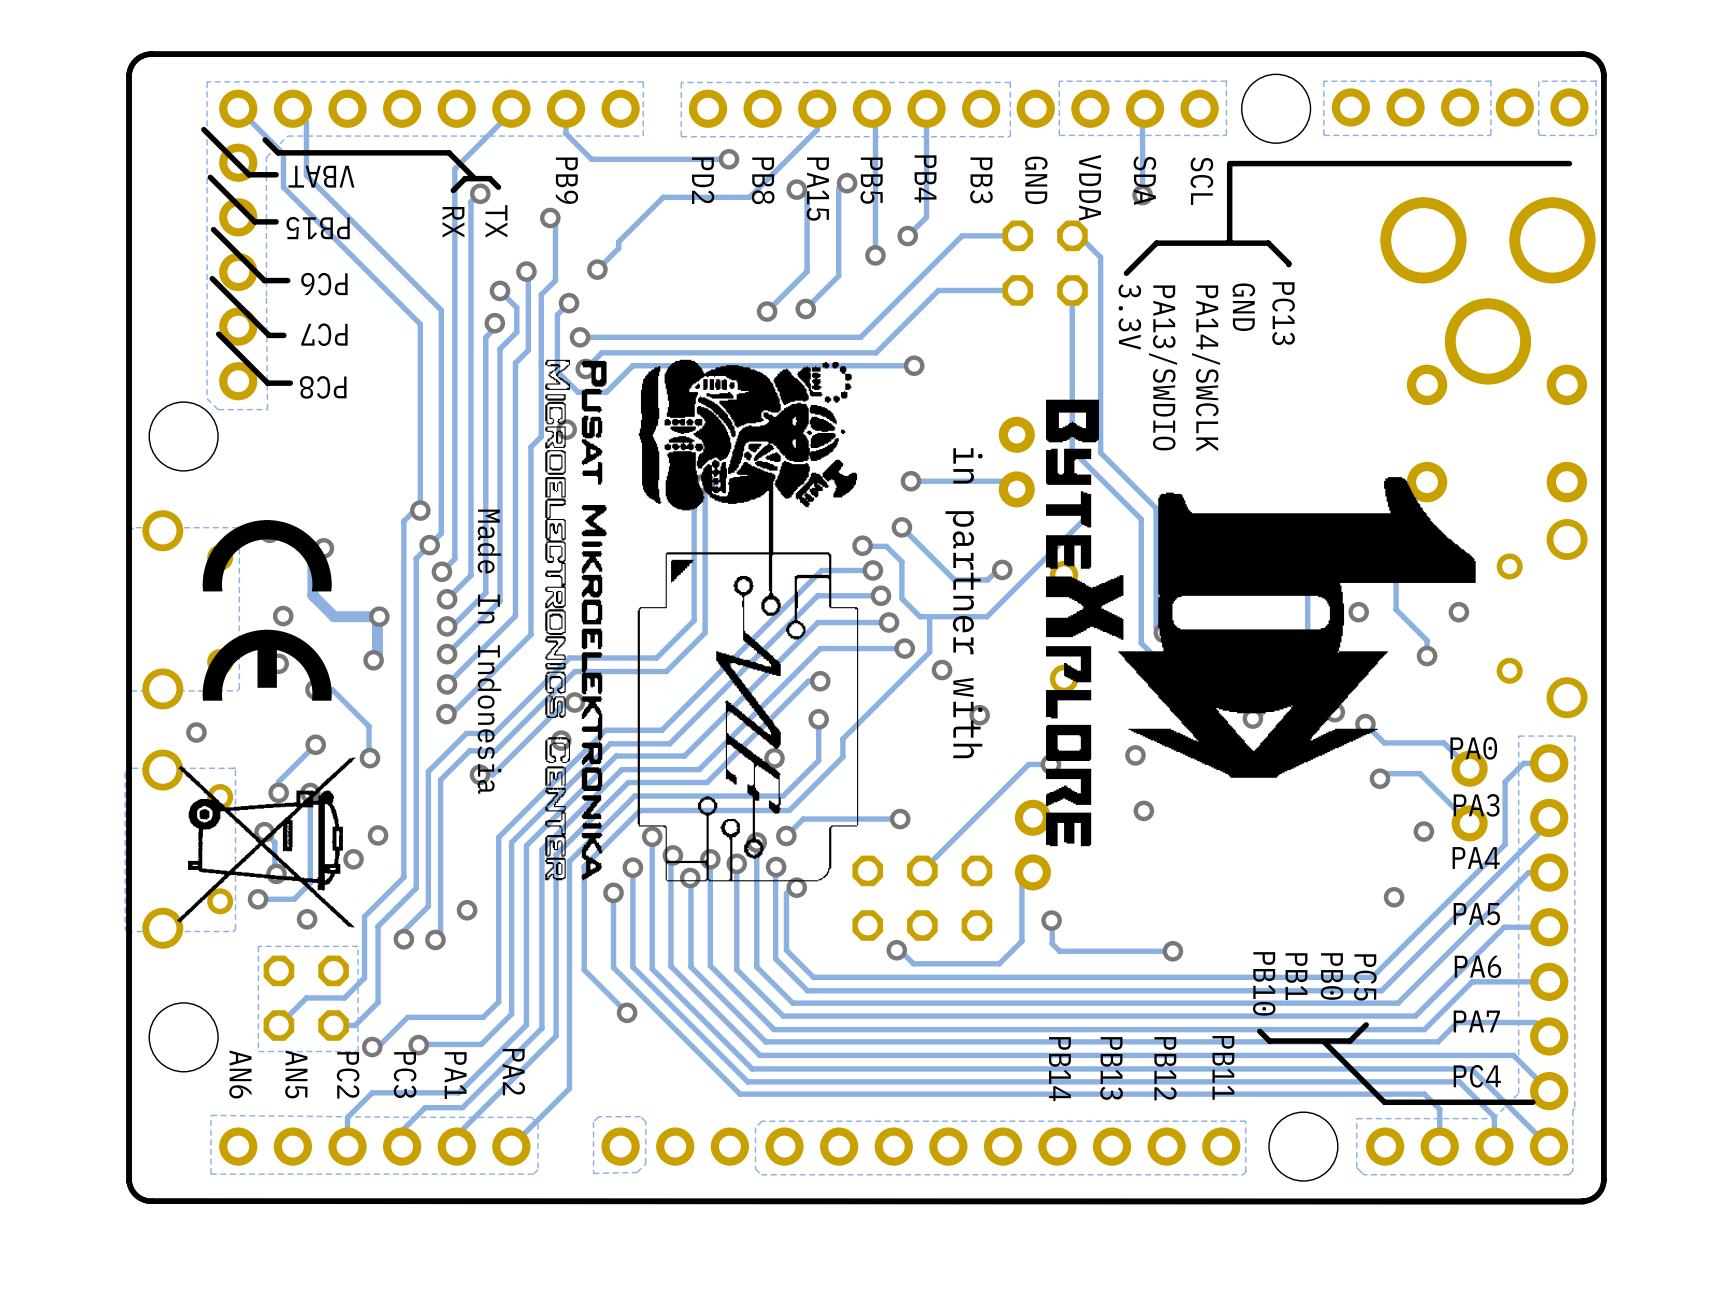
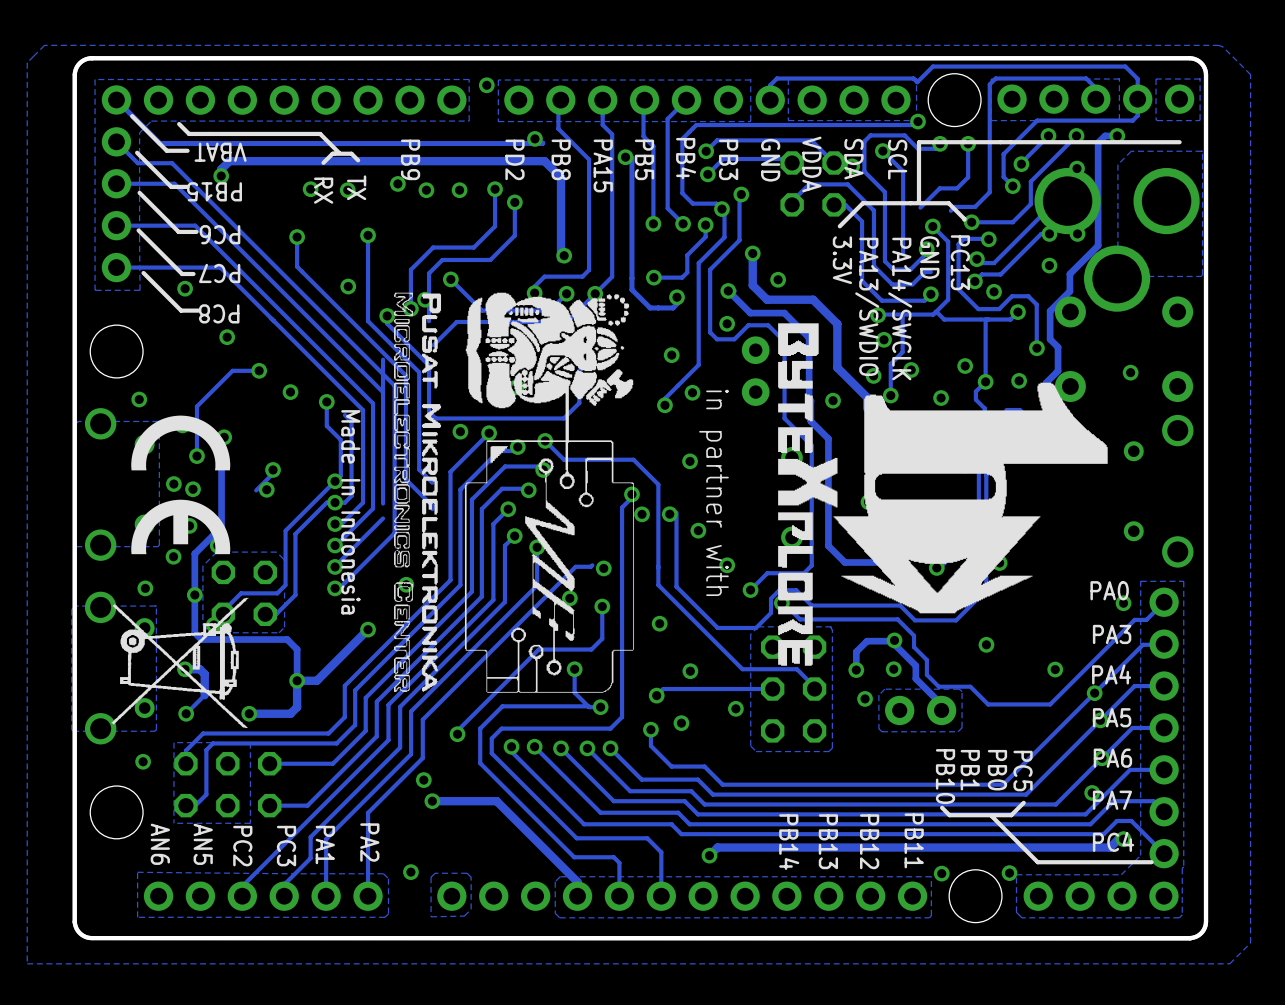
zone outline: none -> (1218, 45) (44, 45) (27, 62) (27, 963) (1229, 963) (1250, 943) (1250, 74) (1222, 46) (1218, 45)
zone outline: (207, 81) (207, 398) (218, 409) (267, 409) (266, 157) (287, 136) -> (134, 79) (95, 79) (95, 290) (140, 290) (139, 132) (151, 121) (196, 121)
via: none -> (486, 85)
track: none -> (1095, 99) (1095, 88) (1086, 78) (995, 78) (989, 84) (989, 192) (975, 206) (954, 206) (950, 210)
track: none -> (116, 99) (160, 143) (542, 143)
track: (238, 108) (283, 153) (283, 187) (420, 324) (420, 510) (414, 510) (403, 521) (403, 670) -> (326, 401) (326, 425) (340, 439) (340, 475) (285, 530)
track: (292, 108) (306, 122) (306, 175) (441, 310) (441, 533) (416, 558) (416, 888) (378, 926) (378, 1002) (355, 1025) (333, 1025) -> none
track: (511, 108) (511, 112) (454, 168) (454, 558) (441, 571) -> none
track: (566, 108) (566, 133) (591, 159) (729, 159) -> none
track: (871, 108) (875, 112) (875, 255) -> (644, 100) (643, 136) (653, 146) (653, 223)
track: (926, 108) (926, 217) (907, 236) -> (686, 100) (667, 118) (667, 208) (683, 223)
track: none -> (770, 100) (770, 85) (776, 78) (913, 78) (917, 82) (932, 66) (1125, 66) (1137, 78) (1137, 115) (1132, 120) (1037, 120) (1003, 154) (1003, 176) (1012, 186)
track: (1145, 108) (1142, 111) (1142, 195) -> none
track: none -> (558, 102) (558, 128) (589, 159) (589, 270) (582, 276) (544, 276) (534, 286) (534, 293)
track: (817, 129) (749, 197) (663, 197) (618, 241) (618, 248) (597, 269) -> (602, 116) (602, 124) (612, 134) (612, 276) (566, 321) (456, 321) (433, 345)
track: none -> (918, 121) (914, 125) (696, 125) (682, 138) (682, 193) (692, 203) (716, 203) (724, 211) (724, 237) (698, 263) (698, 364) (664, 398) (664, 405)
via: none -> (918, 121)
track: none -> (1048, 135) (1021, 164)
via: none -> (1048, 135)
track: none -> (1076, 135) (1030, 181) (1030, 204) (1012, 222) (971, 222)
via: none -> (1076, 135)
track: none -> (1117, 135) (1105, 135) (1098, 142) (1098, 245) (1069, 273) (1069, 291) (1050, 311) (1050, 339) (1058, 347) (1058, 370) (1046, 382) (1046, 441) (1062, 458)
via: none -> (1117, 135)
track: none -> (116, 141) (137, 163) (172, 163) (394, 385) (394, 533) (339, 588) (335, 588)
track: none -> (940, 143) (935, 148) (918, 148) (904, 135) (870, 135) (864, 141) (864, 171) (884, 192) (884, 261) (893, 269) (910, 269) (926, 253) (926, 249)
via: none -> (940, 143)
track: none -> (968, 143) (968, 177) (957, 188) (939, 188) (920, 207)
via: none -> (968, 143)
zone outline: none -> (1201, 150) (1202, 274) (1119, 276) (1117, 164) (1131, 151) (1201, 150)
track: none -> (706, 151) (717, 140) (811, 140) (834, 162)
via: none -> (706, 151)
track: none -> (882, 151) (903, 171) (903, 253)
via: none -> (882, 151)
track: (847, 183) (845, 181) (838, 188) (838, 276) (805, 308) -> none
track: none -> (631, 157) (631, 289) (650, 307) (673, 307) (679, 301)
track: (796, 189) (800, 189) (807, 196) (807, 271) (767, 311) -> none
via: (796, 189) -> none
track: none -> (792, 162) (788, 159) (723, 159) (707, 174)
via: none -> (1021, 164)
track: (480, 193) (470, 201) (470, 575) (447, 599) -> none
via: (480, 193) -> none
via: none -> (1077, 168)
via: none -> (707, 174)
track: none -> (221, 176) (221, 169) (229, 161) (544, 161) (561, 177) (561, 258)
via: none -> (221, 176)
track: none -> (116, 183) (174, 183) (383, 392)
track: (550, 218) (555, 218) (555, 280) (541, 294) (541, 436) (530, 447) -> none
via: none -> (1012, 186)
via: none -> (310, 189)
track: none -> (495, 189) (495, 226) (473, 247) (433, 247) (410, 269) (410, 308)
via: none -> (495, 189)
via: none -> (347, 190)
via: none -> (426, 190)
via: none -> (459, 190)
track: none -> (741, 194) (739, 196) (739, 240) (710, 269) (710, 332) (717, 339) (734, 339) (748, 325) (768, 325) (784, 341) (784, 418) (811, 445) (811, 565) (804, 573) (767, 573) (750, 590)
via: none -> (741, 194)
track: (1017, 235) (962, 235) (860, 337) (579, 337) -> none
track: (1072, 235) (1079, 235) (1100, 257) (1100, 452) (1156, 508) (1156, 627) (1161, 633) (1163, 632) -> none
via: (907, 236) -> none
track: none -> (1049, 201) (1049, 207) (994, 263) (977, 263) (976, 259)
track: none -> (514, 202) (514, 235) (490, 259) (442, 259) (429, 273) (429, 321)
via: none -> (514, 202)
track: none -> (792, 204) (792, 201) (809, 184) (847, 184) (873, 210) (873, 266) (892, 284) (912, 284) (924, 272) (930, 272)
track: none -> (834, 204) (845, 204) (862, 221) (862, 280) (881, 300) (924, 300) (930, 294)
via: none -> (721, 209)
via position: (875, 255) -> (653, 223)
part position: (1045, 263) -> (813, 183)
via: none -> (971, 222)
via: (597, 269) -> none
via: none -> (683, 223)
part position: (238, 271) -> (116, 183)
track: (526, 271) (528, 273) (528, 350) (515, 363) (515, 616) (447, 684) -> none
via: (526, 271) -> none
track: none -> (705, 225) (705, 236) (687, 255) (687, 272) (682, 277) (653, 277)
via: none -> (705, 225)
track: none -> (116, 225) (195, 225) (373, 403) (373, 508) (335, 545)
track: none -> (932, 226) (948, 241) (948, 299) (933, 314) (881, 314) (878, 317) (878, 315)
via: none -> (932, 226)
track: none -> (1049, 233) (1041, 233) (1000, 274) (981, 274) (974, 281)
via: none -> (1049, 233)
via: none -> (1077, 233)
track: none -> (368, 235) (368, 321) (419, 372) (419, 469) (432, 482)
via: none -> (368, 235)
track: none -> (297, 237) (297, 266) (405, 375) (405, 479) (432, 505) (432, 509)
via: none -> (297, 237)
track: (499, 290) (516, 307) (516, 332) (499, 348) (499, 601) (447, 654) -> none
via: (499, 290) -> none
track: (1017, 290) (938, 290) (876, 352) (601, 352) (585, 368) -> none
track: (1072, 290) (1072, 450) (1141, 519) (1141, 643) (1196, 697) -> none
track: none -> (988, 239) (964, 238) (958, 244) (958, 289) (978, 309) (999, 309) (1012, 296) (1028, 296) (1036, 304) (1036, 348)
via: none -> (988, 239)
track: (569, 303) (557, 314) (557, 371) (578, 392) (606, 392) (632, 365) (914, 365) -> none
via: (569, 303) -> none
via: none -> (926, 249)
via: (805, 308) -> none
track: none -> (752, 253) (752, 285) (767, 299) (813, 299) (837, 323) (837, 367) (867, 397) (867, 408)
via: none -> (752, 253)
via: none -> (976, 259)
track: (494, 323) (494, 328) (485, 337) (485, 592) (452, 626) (447, 626) -> none
via: (494, 323) -> none
via: none -> (1049, 265)
track: none -> (116, 267) (220, 267) (363, 410) (363, 502) (341, 524) (335, 524)
via: (579, 337) -> none
via: none -> (653, 277)
track: none -> (450, 279) (482, 310) (549, 310) (566, 293)
via: none -> (450, 279)
via: none -> (778, 279)
via: none -> (974, 281)
via: none -> (348, 286)
via: none -> (185, 288)
via: none -> (728, 290)
track: none -> (734, 290) (728, 290) (750, 313) (784, 313) (809, 337) (810, 421) (828, 438) (828, 545) (844, 562) (879, 562) (883, 565)
via: none -> (994, 291)
via: none -> (534, 293)
via: none -> (566, 293)
via: none -> (595, 293)
via: none -> (930, 294)
via: none -> (410, 308)
track: none -> (935, 312) (944, 319) (988, 319)
track: none -> (1017, 312) (1010, 319) (985, 319) (985, 381) (975, 391) (975, 399) (984, 408) (984, 433) (989, 438) (1006, 438)
via: none -> (1017, 312)
track: none -> (902, 314) (902, 352) (890, 364) (890, 395)
via: none -> (878, 315)
track: none -> (387, 315) (387, 323) (429, 365) (429, 411) (435, 418) (563, 418) (579, 402) (579, 370) (587, 362)
via: none -> (387, 315)
via: none -> (727, 323)
via: none -> (227, 337)
via: none -> (884, 339)
via: (566, 429) -> none
via: none -> (1036, 348)
via: none -> (671, 355)
via: none -> (965, 366)
via: none -> (911, 370)
track: none -> (259, 370) (232, 370) (196, 406) (196, 456)
via: none -> (259, 370)
via: none -> (1130, 372)
via: none -> (873, 375)
via: none -> (1019, 380)
via: none -> (985, 381)
track: (910, 481) (1008, 481) (1016, 489) -> none
via: (910, 481) -> none
track: (678, 483) (678, 493) (694, 509) (694, 620) (656, 657) (569, 657) (494, 733) (466, 733) (428, 771) (428, 906) (403, 930) (403, 939) -> none
track: (705, 483) (705, 632) (666, 671) (574, 671) (495, 750) (469, 750) (440, 779) (440, 934) (435, 939) -> none
via: none -> (290, 392)
via: none -> (692, 392)
via: none -> (890, 395)
via: none -> (941, 398)
via: none -> (139, 399)
via: none -> (833, 400)
via: none -> (326, 401)
via: none -> (664, 405)
via: (420, 510) -> none
track: none -> (1006, 410) (1019, 410) (1029, 419) (1029, 447) (1021, 456) (1005, 456) (986, 475) (986, 590) (956, 620) (915, 620) (900, 605) (811, 605) (796, 590) (779, 590) (771, 598) (771, 612) (756, 627) (717, 627) (676, 586) (676, 512)
track: (1087, 516) (987, 616) (919, 616) (901, 598) (901, 561) (886, 546) (862, 545) -> none
track: none -> (344, 415) (351, 421) (351, 496) (344, 502) (326, 502) (295, 533) (295, 594) (276, 614) (265, 614)
track: (901, 527) (954, 579) (987, 579) (999, 567) (1002, 569) -> none
via: (901, 527) -> none
track: (1396, 536) (1396, 609) (1427, 640) (1427, 656) -> none
via: none -> (460, 431)
track: none -> (489, 433) (450, 471) (450, 580) (344, 685) (344, 717) (328, 733) (203, 733) (185, 750) (185, 763)
via: none -> (489, 433)
via: (429, 545) -> none
via: (862, 545) -> none
track: (323, 548) (312, 548) (312, 595) (334, 616) (379, 616) (377, 618) (377, 656) (373, 660) -> none
track: none -> (545, 440) (564, 459) (633, 459) (658, 484) (658, 585) (742, 669) (796, 669) (814, 689)
via: none -> (545, 440)
track: none -> (221, 446) (221, 527) (194, 553) (194, 632) (201, 639) (287, 639) (297, 649) (297, 680)
track: none -> (517, 447) (513, 450) (499, 450) (460, 489) (460, 585) (355, 690) (355, 724) (336, 743) (212, 743) (206, 750) (206, 794) (195, 805) (185, 805)
via: none -> (517, 447)
via: (1002, 569) -> none
track: (872, 570) (821, 570) (661, 730) (605, 730) (498, 837) (498, 1001) (483, 1017) (407, 1017) (378, 1047) (372, 1047) -> none
via: (872, 570) -> none
via: (441, 571) -> none
via: none -> (196, 456)
via: none -> (690, 461)
track: none -> (273, 469) (273, 473) (256, 490)
via: none -> (273, 469)
track: none -> (543, 469) (539, 466) (505, 466) (471, 499) (471, 591) (365, 697) (365, 730) (332, 763) (269, 763)
via: none -> (543, 469)
track: (880, 595) (817, 595) (669, 743) (610, 743) (511, 842) (511, 1014) (481, 1044) (418, 1045) -> none
via: (880, 595) -> none
via: (447, 599) -> none
via: none -> (335, 481)
via: none -> (173, 484)
via: (1358, 612) -> none
via: (1458, 612) -> none
track: (929, 616) (929, 652) (842, 738) (842, 757) (789, 810) (640, 810) (584, 866) (584, 969) (627, 1012) -> none
track: none -> (528, 490) (502, 488) (481, 509) (481, 596) (376, 701) (376, 736) (307, 805) (269, 805)
via: none -> (528, 490)
track: none -> (631, 494) (631, 497) (622, 507) (622, 717) (610, 728) (501, 728) (491, 738) (491, 753) (576, 838) (647, 838) (661, 852) (661, 896)
via: none -> (631, 494)
track: (889, 622) (818, 622) (684, 756) (616, 756) (526, 845) (526, 1025) (458, 1092) (372, 1092) (347, 1117) (347, 1133) -> (508, 509) (493, 524) (493, 599) (388, 704) (388, 740) (242, 886)
via: (889, 622) -> none
via: (447, 626) -> none
via: none -> (335, 502)
track: (530, 634) (451, 714) (446, 714) -> none
via: none -> (508, 509)
via: none -> (642, 514)
track: (904, 648) (820, 648) (699, 769) (621, 769) (541, 849) (541, 1028) (462, 1107) (425, 1107) (402, 1130) (402, 1146) -> (514, 536) (504, 545) (504, 602) (400, 706) (400, 747) (310, 837) (310, 858) (285, 883) (284, 896)
via: (447, 654) -> none
track: none -> (383, 518) (335, 566)
via: (1427, 656) -> none
via: (373, 660) -> none
via: none -> (335, 524)
via: none -> (514, 536)
track: (820, 681) (808, 681) (707, 782) (628, 782) (556, 854) (556, 1036) (456, 1135) -> (537, 547) (537, 585) (411, 711) (411, 754) (326, 839) (326, 887)
via: (820, 681) -> none
via: (447, 684) -> none
track: (315, 689) (332, 689) (369, 726) (369, 758) -> none
via: none -> (335, 545)
via: none -> (537, 547)
zone outline: none -> (276, 552) (284, 561) (284, 627) (279, 632) (210, 632) (202, 624) (202, 565) (216, 552) (276, 552)
track: (574, 702) (565, 702) (492, 774) (479, 774) -> none
via: (574, 702) -> none
via: none -> (173, 556)
via: (446, 714) -> none
via: none -> (335, 566)
track: (818, 719) (818, 760) (783, 796) (634, 796) (569, 861) (569, 1088) (511, 1146) -> (592, 565) (575, 566) (422, 719) (422, 758) (368, 812) (368, 896)
track: (1365, 724) (1384, 742) (1443, 742) (1469, 768) -> none
via: (1365, 724) -> none
via position: (196, 732) -> (145, 588)
track: (403, 741) (403, 877) (364, 916) (364, 977) (344, 997) (306, 997) (278, 1025) -> (285, 585) (277, 593) (241, 593) (223, 610) (223, 614)
track: (315, 744) (278, 781) (278, 792) -> none
via: (315, 744) -> none
via: none -> (335, 588)
via: none -> (750, 590)
via: none -> (194, 594)
via: (1135, 755) -> none
via: (369, 758) -> none
track: (1549, 763) (1523, 763) (1505, 781) (1505, 844) (1372, 977) (813, 977) (786, 950) (786, 893) (792, 887) (796, 887) -> (1164, 602) (1146, 619) (1134, 619) (1050, 704) (988, 704) (970, 686) (938, 686) (926, 674) (926, 659) (914, 647) (914, 635) (897, 619) (800, 619) (791, 610)
track: (1050, 764) (1028, 764) (922, 870) -> none
via: none -> (1123, 603)
track: none -> (602, 606) (602, 638) (591, 649) (538, 649) (457, 730) (457, 734)
via: none -> (602, 606)
via: (479, 774) -> none
track: (1379, 778) (1384, 773) (1419, 773) (1469, 823) -> none
via: (1379, 778) -> none
via: none -> (659, 623)
via: (278, 792) -> none
track: (310, 793) (310, 883) (294, 899) (258, 899) -> none
zone outline: none -> (831, 626) (758, 626) (750, 634) (750, 746) (756, 751) (828, 751) (832, 748) (831, 626)
part: (1469, 796) -> none
track: none -> (368, 629) (316, 680) (297, 680)
via: none -> (368, 629)
via: (1143, 810) -> none
via: none -> (894, 640)
track: (1549, 817) (1549, 823) (1381, 990) (807, 990) (775, 958) (776, 867) -> (1164, 644) (1143, 644) (1003, 784) (722, 784) (704, 766) (671, 766) (650, 745) (650, 729)
via: none -> (986, 644)
track: (900, 819) (803, 819) (786, 835) -> none
via: (900, 819) -> none
via: (1423, 831) -> none
track: (264, 832) (274, 842) (276, 873) -> none
via position: (264, 832) -> (185, 669)
via: (378, 835) -> none
via: (786, 835) -> none
track: (652, 836) (652, 968) (752, 1068) (1471, 1068) (1549, 1146) -> none
via: (652, 836) -> none
track: (756, 842) (756, 967) (792, 1003) (1398, 1003) (1528, 872) -> (610, 748) (641, 779) (697, 779) (712, 794) (1026, 794) (1134, 686) (1148, 686)
via: (756, 842) -> none
part: (1032, 845) -> none
track: none -> (185, 669) (199, 669) (204, 674) (204, 695) (186, 713)
track: none -> (574, 669) (574, 692) (589, 707) (600, 707)
via: none -> (574, 669)
via: none -> (893, 669)
track: none -> (856, 670) (856, 651) (867, 641) (894, 640) (894, 644) (915, 665) (915, 678) (941, 704) (941, 710)
via: none -> (856, 670)
via: none -> (1055, 669)
via: none -> (690, 671)
track: (672, 855) (670, 857) (670, 966) (759, 1055) (1513, 1055) -> (511, 746) (511, 751) (584, 824) (671, 824) (681, 834) (1103, 834) (1116, 820) (1131, 820) (1136, 826)
via: (672, 855) -> none
via: (353, 859) -> none
track: (710, 859) (710, 965) (774, 1029) (1424, 1029) (1472, 981) (1504, 981) -> (561, 748) (613, 801) (684, 801) (697, 814) (1085, 814) (1130, 769)
via: (710, 859) -> none
track: (736, 863) (736, 969) (783, 1016) (1415, 1016) (1504, 927) (1507, 927) -> (587, 748) (630, 791) (691, 791) (704, 804) (1055, 804) (1132, 727)
via: (736, 863) -> none
track: none -> (297, 680) (297, 707) (290, 713) (249, 713)
via: none -> (297, 680)
track: (632, 867) (632, 967) (747, 1081) (1459, 1081) (1494, 1116) (1494, 1146) -> none
via: (632, 867) -> none
via: (776, 867) -> none
track: (1032, 872) (1021, 883) (1021, 941) (999, 963) (913, 963) (899, 950) (896, 950) -> none
via: (276, 873) -> none
track: none -> (772, 689) (663, 689) (656, 695)
zone outline: none -> (959, 689) (884, 689) (878, 695) (878, 728) (881, 731) (958, 731) (962, 727) (962, 691) (959, 689)
track: (690, 877) (690, 967) (765, 1041) (1438, 1041) (1457, 1022) (1535, 1022) -> (534, 746) (600, 812) (678, 812) (689, 824) (1090, 824) (1113, 801) (1153, 801)
via: (690, 877) -> none
via: none -> (1094, 693)
via: none -> (656, 695)
via: (796, 887) -> none
via: none -> (865, 698)
track: (613, 892) (613, 967) (739, 1094) (1424, 1094) (1439, 1109) (1439, 1146) -> none
via: (613, 892) -> none
via: (1394, 897) -> none
part rotation: 0° (922, 898) -> 90° clockwise (793, 689)
part position: (922, 898) -> (793, 689)
via position: (258, 899) -> (186, 713)
track: none -> (588, 706) (502, 706) (480, 728) (480, 763) (574, 857) (613, 857) (619, 862) (619, 896)
via: none -> (600, 707)
via: none -> (735, 708)
part: none -> (920, 710)
via: none -> (249, 713)
via: (467, 910) -> none
via: none -> (1100, 720)
via: (307, 919) -> none
track: (1051, 920) (1052, 943) (1059, 951) (1172, 951) -> none
via: (1051, 920) -> none
via: none -> (681, 723)
via: none -> (650, 729)
via: none -> (457, 734)
via: (403, 939) -> none
via: (435, 939) -> none
via: (896, 950) -> none
via: none -> (511, 746)
via: none -> (534, 746)
via: (1172, 951) -> none
via: none -> (561, 748)
via: none -> (587, 748)
via: none -> (610, 748)
via: none -> (1102, 758)
via: none -> (143, 761)
via: none -> (423, 780)
part position: (306, 998) -> (244, 593)
part: none -> (227, 784)
via: none -> (1092, 792)
via: (627, 1012) -> none
track: none -> (432, 801) (496, 801) (577, 882) (577, 896)
via: none -> (432, 801)
via: (418, 1045) -> none
via: (372, 1047) -> none
track: none -> (1123, 839) (1118, 839) (1110, 847) (717, 847) (709, 855)
via: none -> (1123, 839)
via: none -> (709, 855)
via: none -> (410, 872)
via: none -> (1009, 873)
via: none -> (941, 873)

